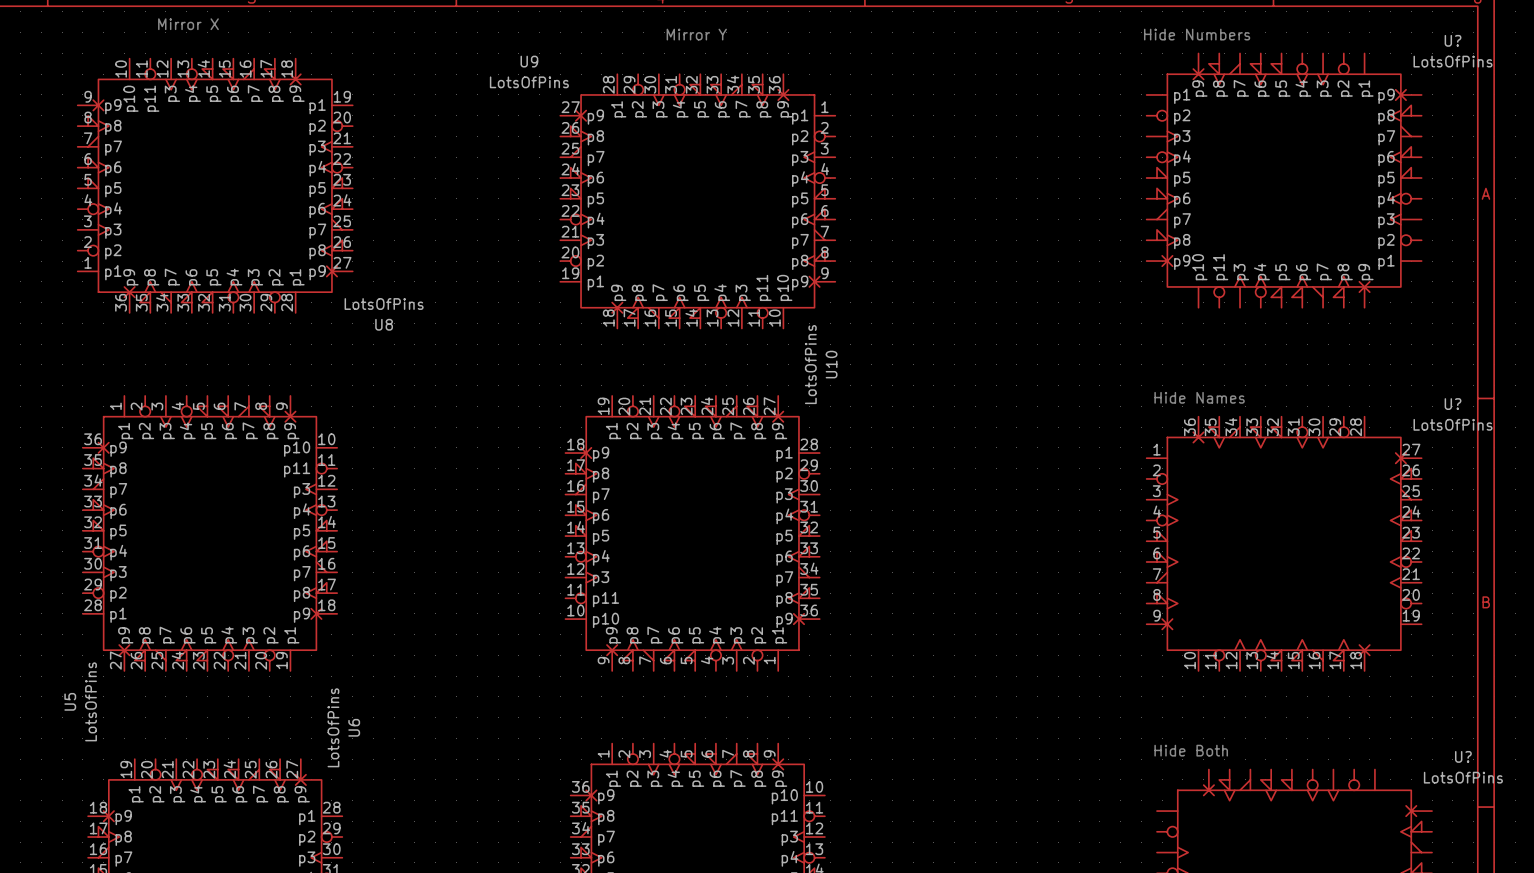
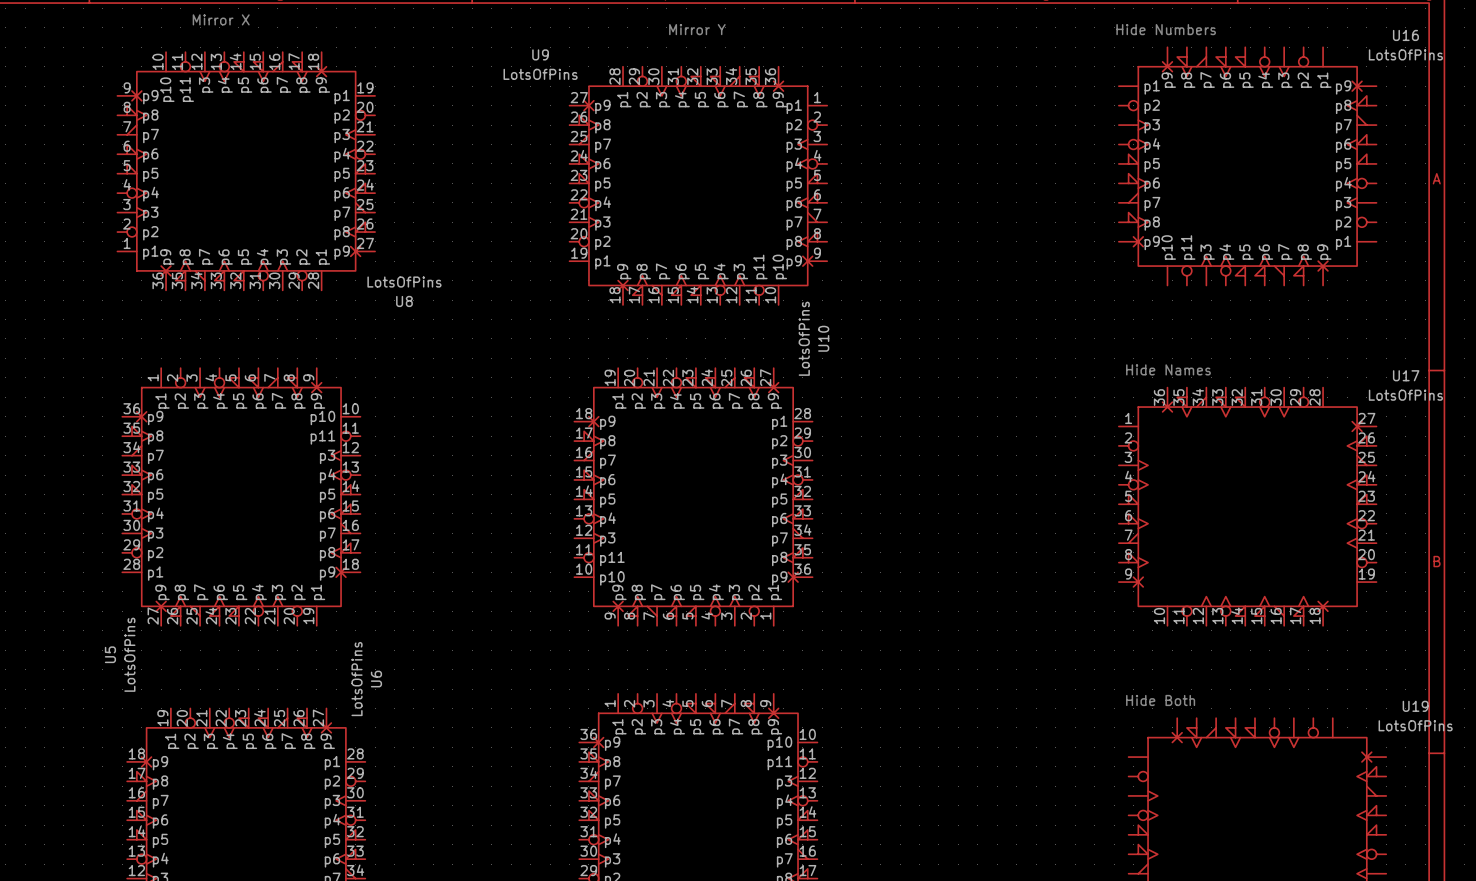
U? name: U? (1453, 40) -> U16 (1405, 35)
U? name: U? (1453, 404) -> U17 (1406, 375)
U? name: U? (1463, 756) -> U19 (1415, 706)

